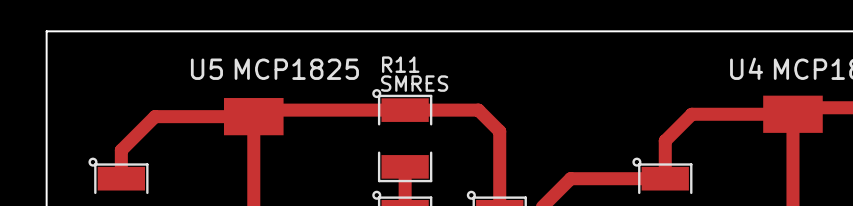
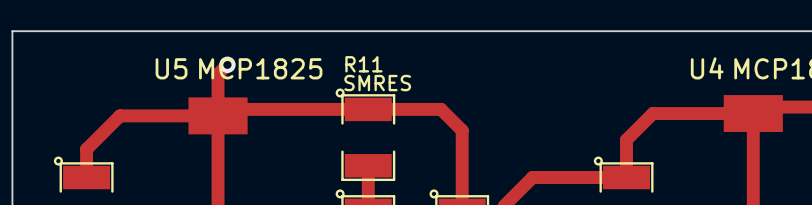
track: none -> (227, 64) (218, 74) (218, 115)
via: none -> (227, 64)

